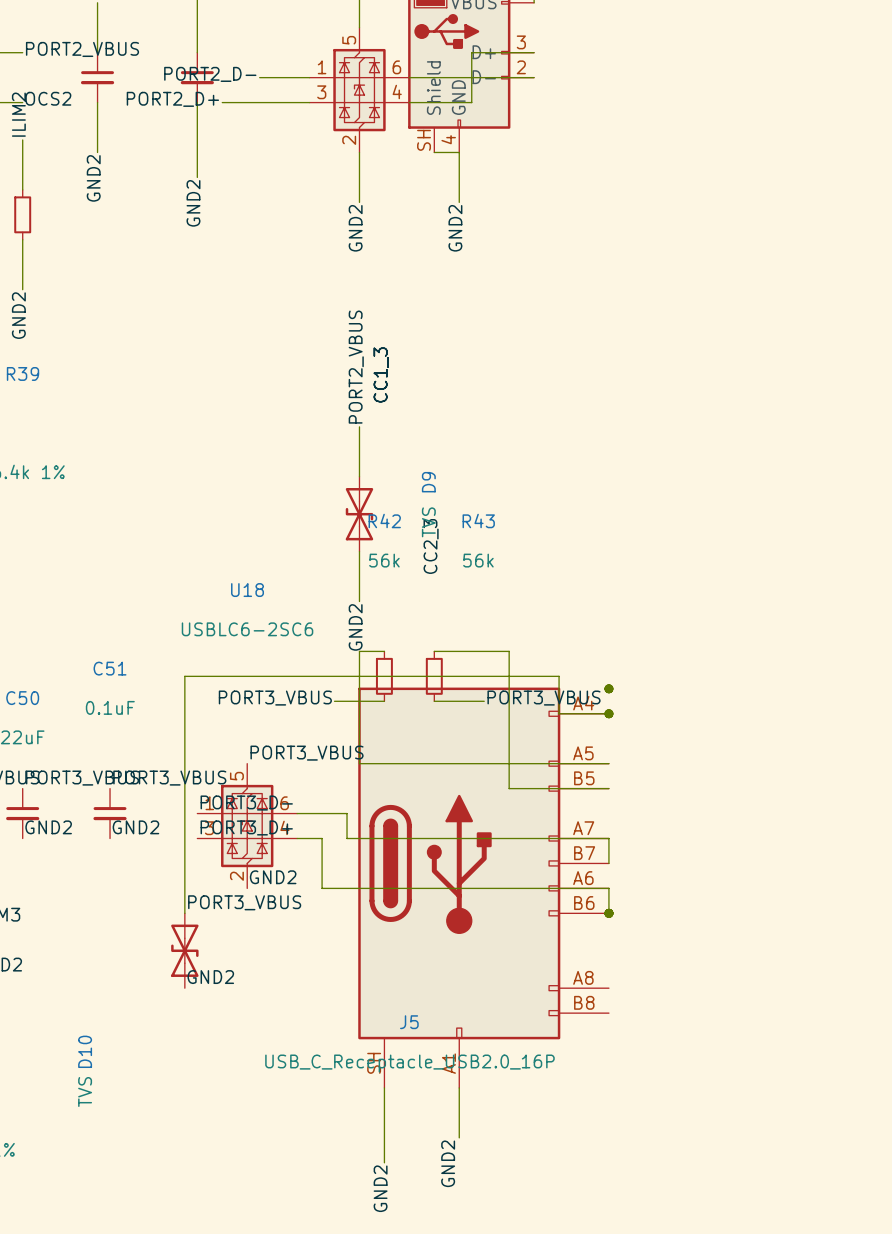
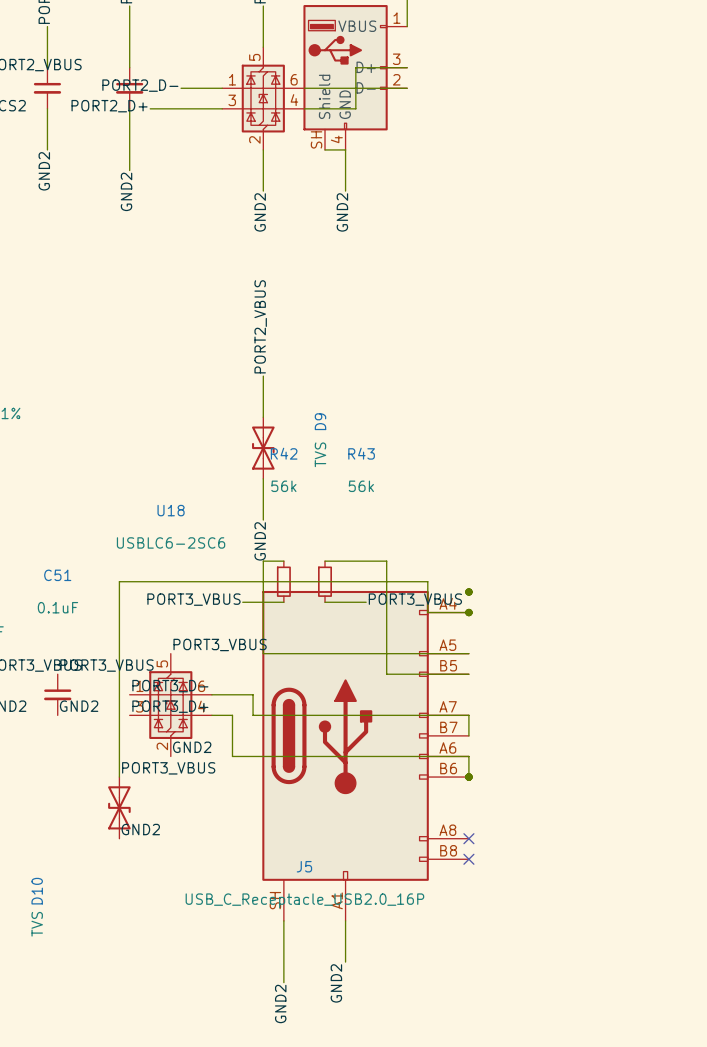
label: CC1_3 (381, 374) -> none
label: CC2_3 (431, 546) -> none
no-connect mark: none -> (468, 838)
no-connect mark: none -> (468, 859)

